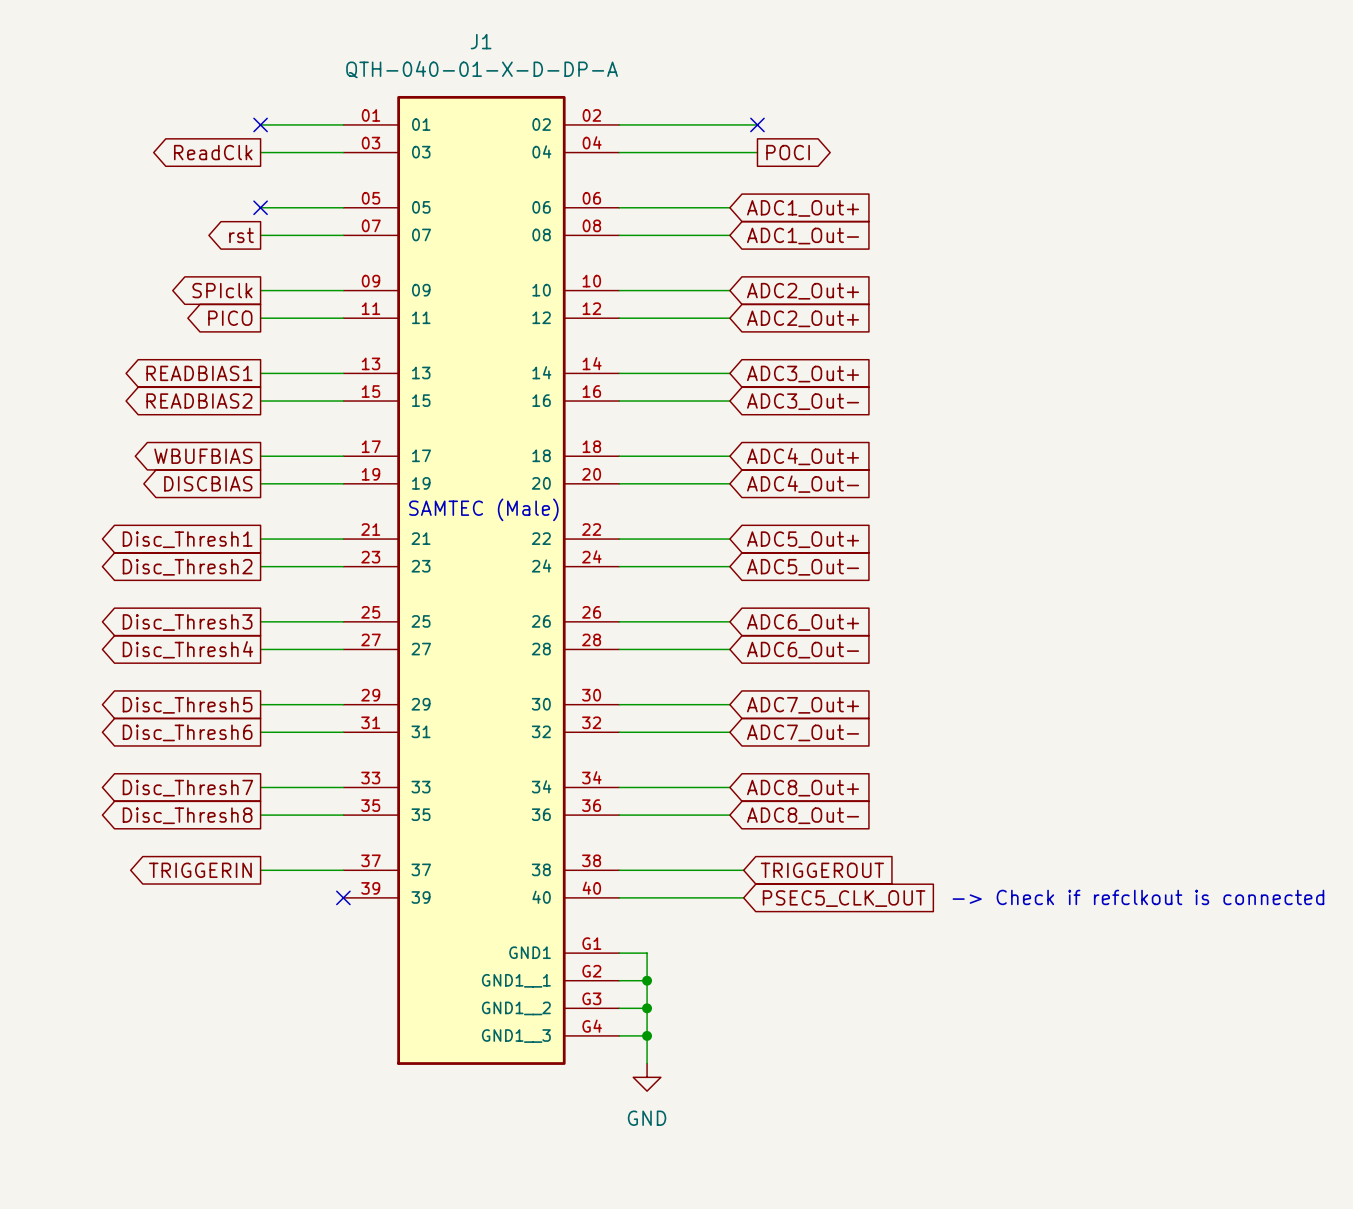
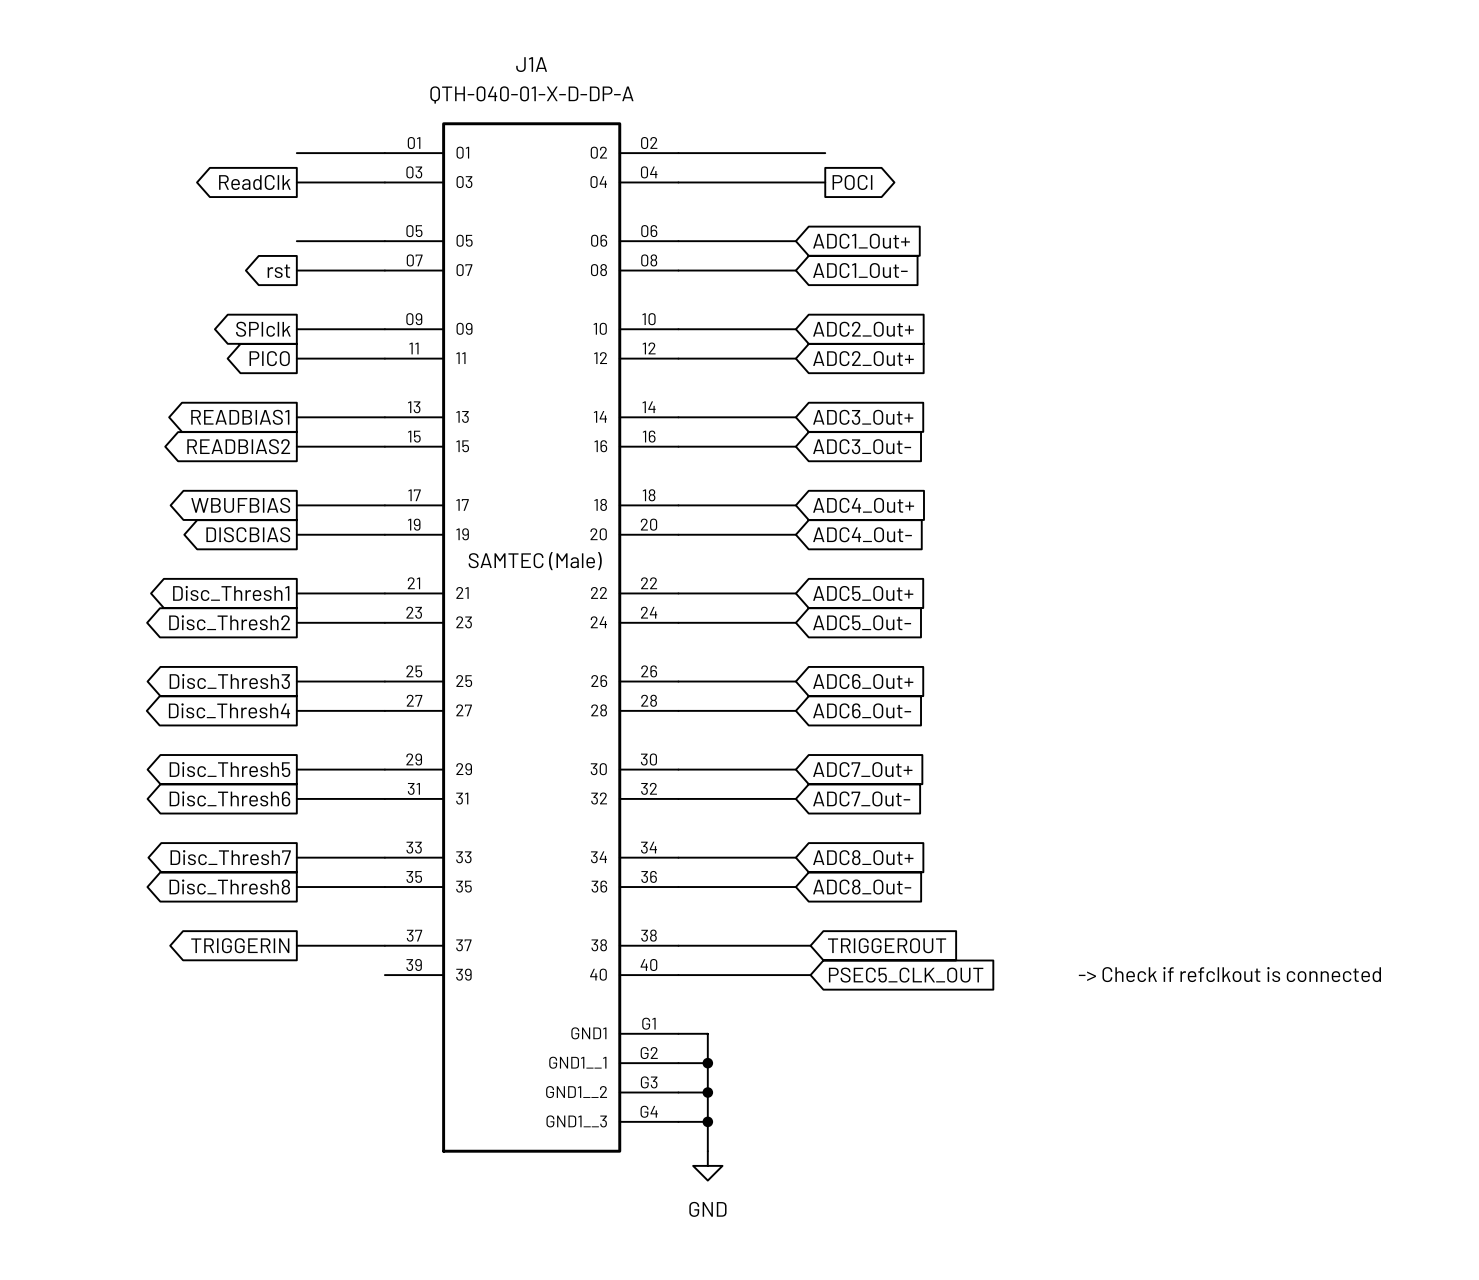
J1 name: J1 (481, 41) -> J1A (531, 64)
no-connect mark: (260, 124) -> none
no-connect mark: (757, 124) -> none
no-connect mark: (260, 207) -> none
no-connect mark: (343, 897) -> none

